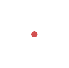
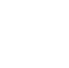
top track: (34, 32) (32, 34) (33, 35) (34, 33) (36, 34) (34, 32) -> none

